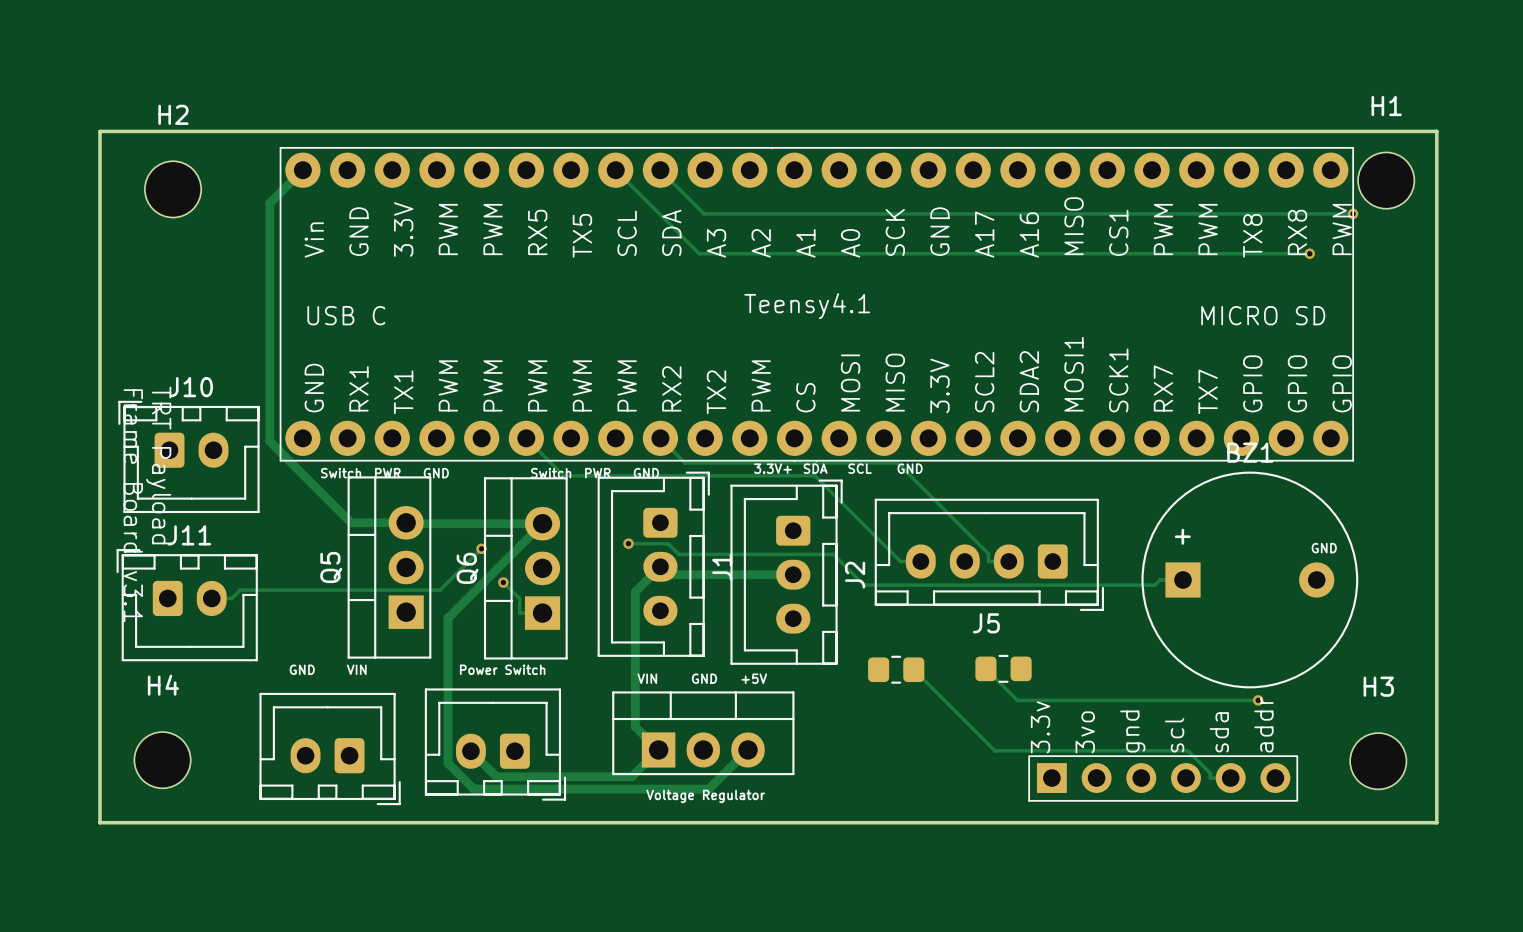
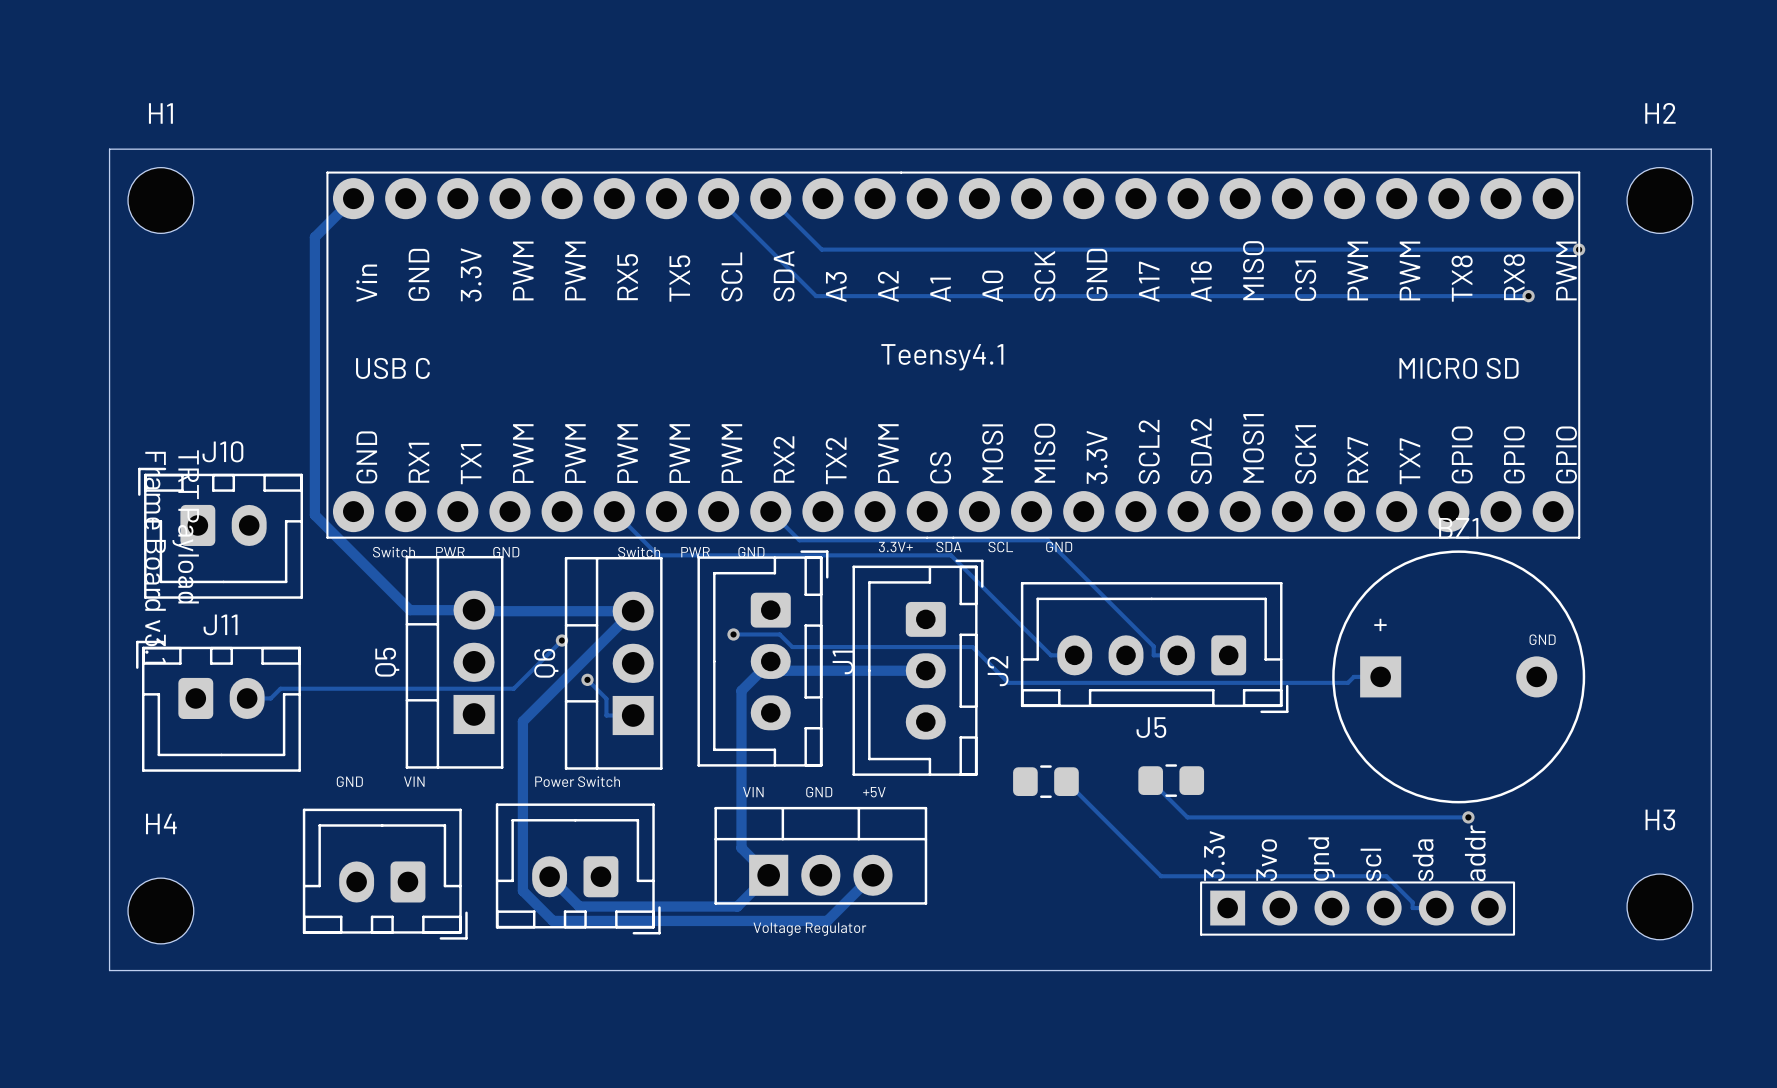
board edge: (99, 131) (1436, 131) (1436, 822) (99, 822) (99, 131) -> (109, 149) (109, 970) (1711, 970) (1711, 149) (109, 149)
H1 position: (1386, 180) -> (160, 200)
H2 position: (173, 189) -> (1659, 200)
H4 position: (162, 760) -> (160, 911)
H3 position: (1378, 761) -> (1659, 906)

